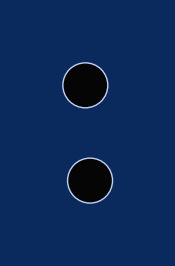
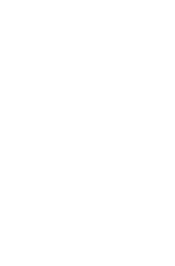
part: (85, 85) -> none
part: (90, 180) -> none

